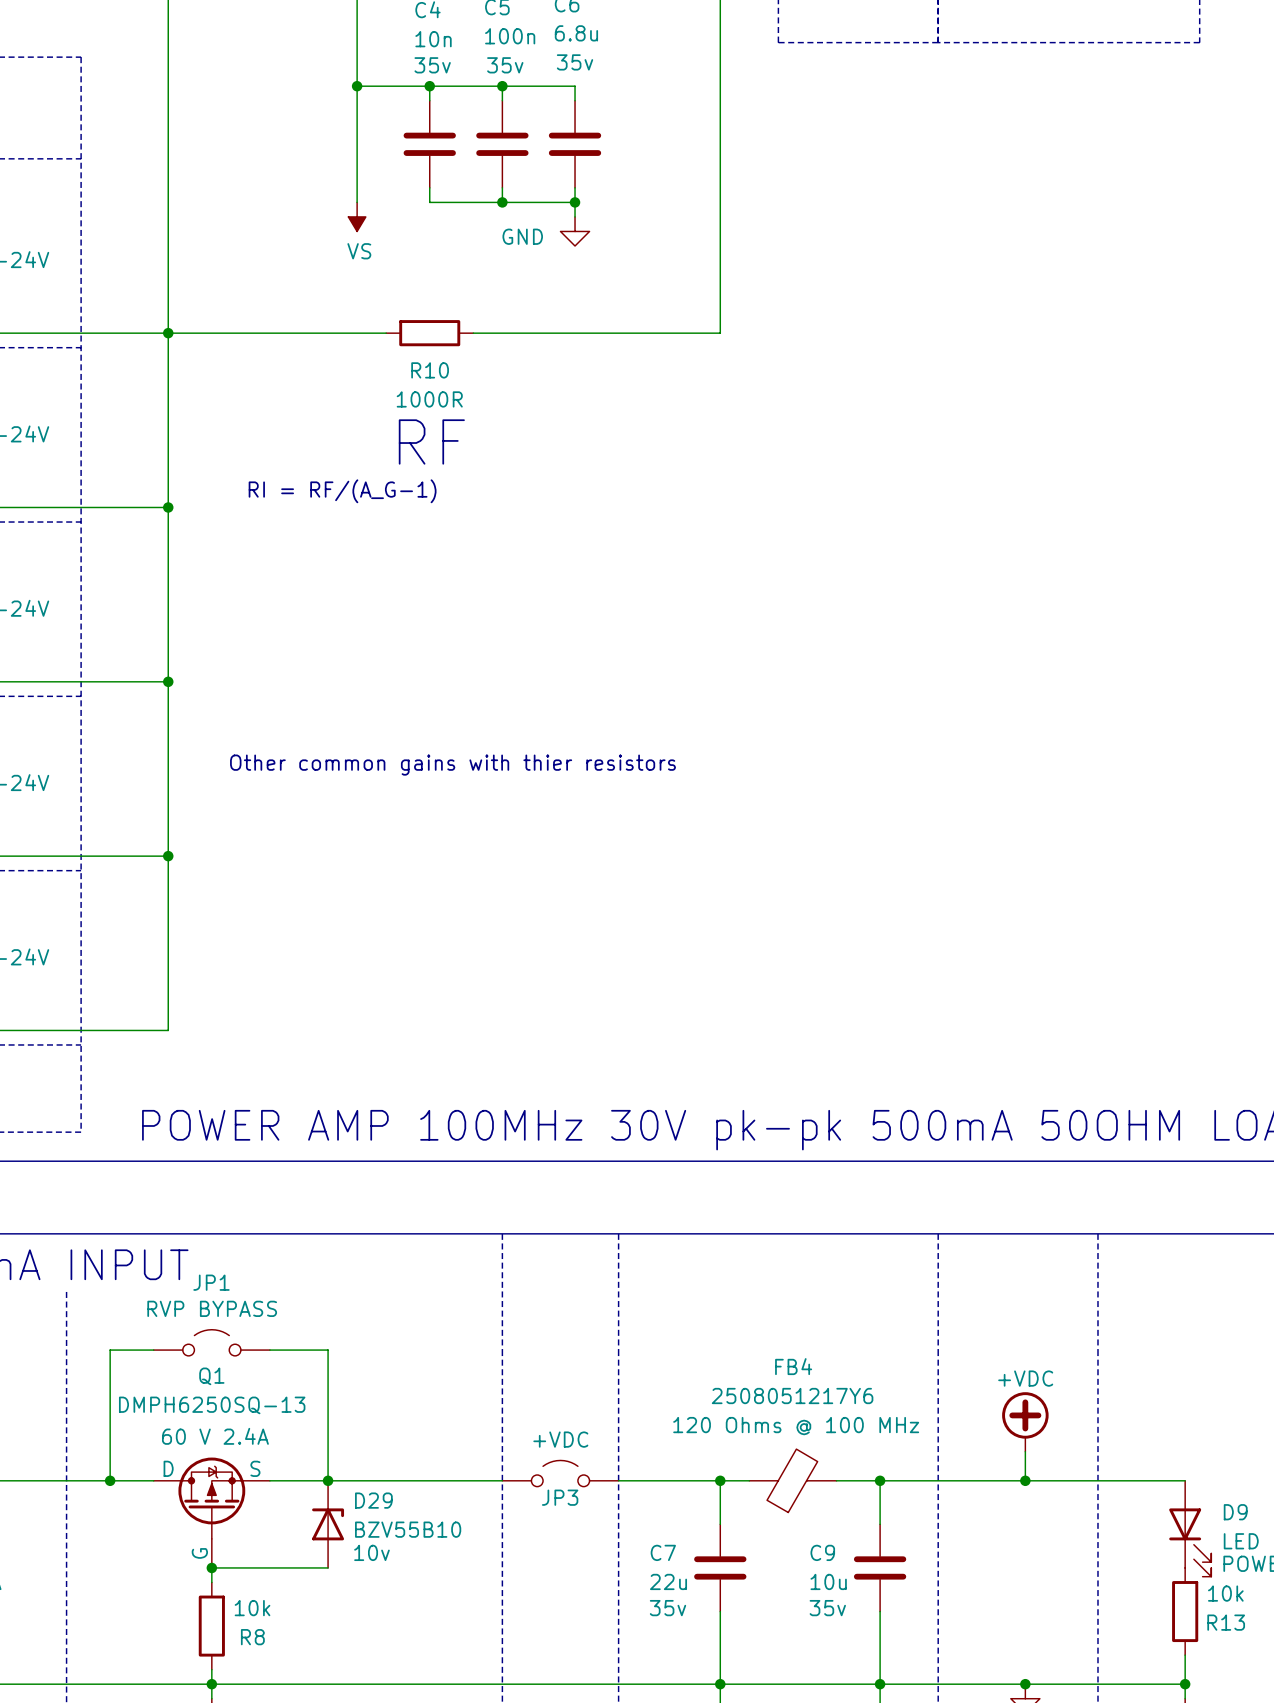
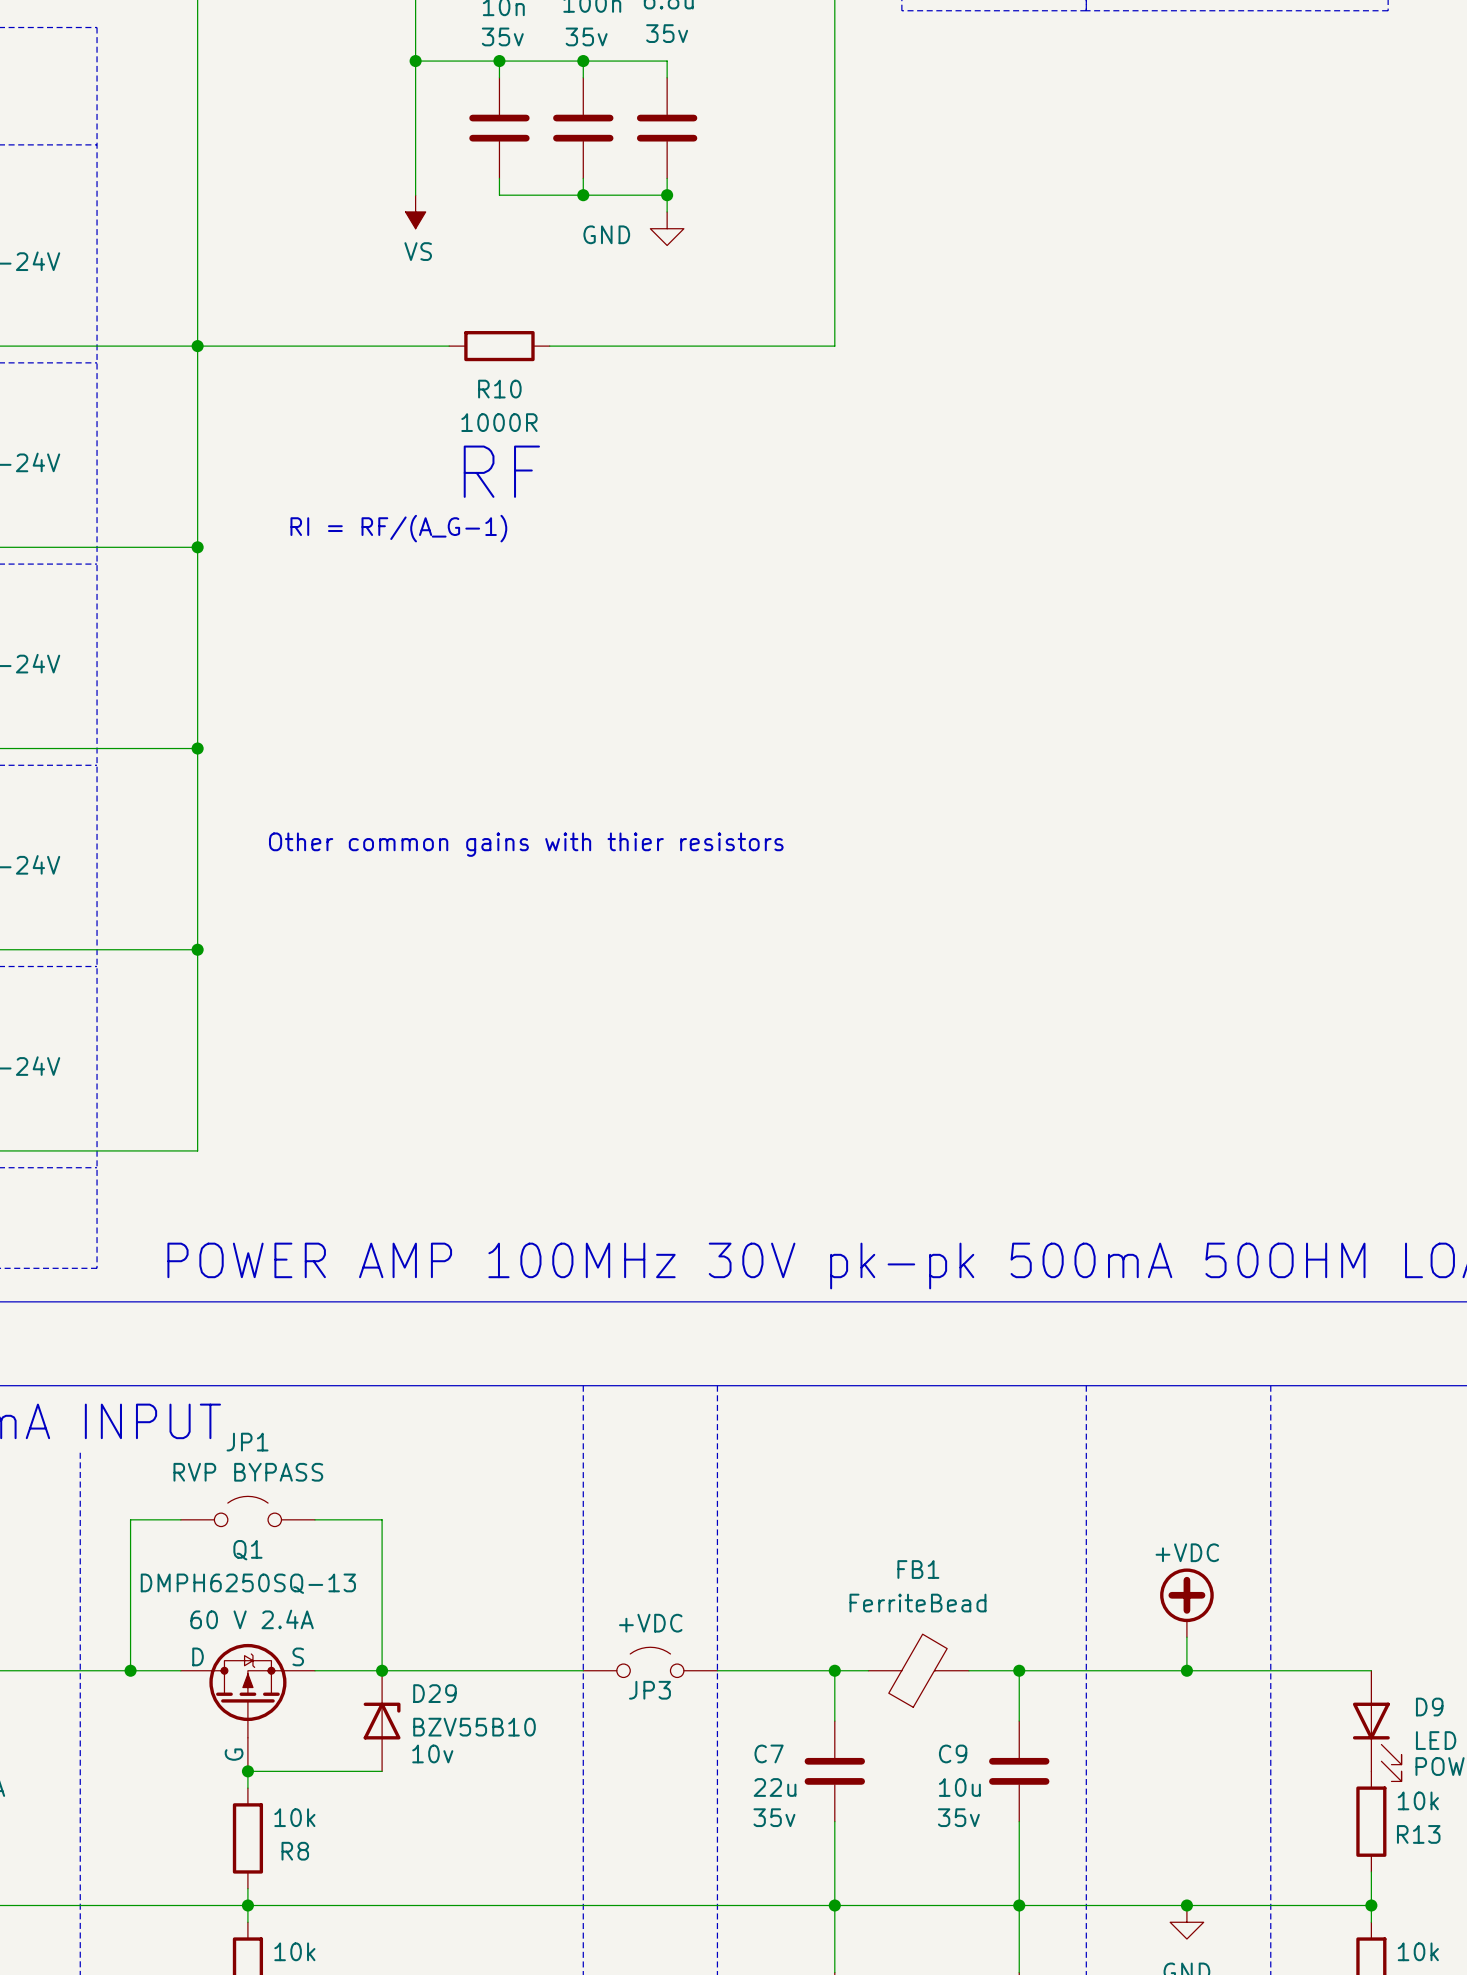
FB4 name: FB4 (793, 1366) -> FB1 (918, 1569)
FB4 value: 2508051217Y6 (792, 1396) -> FerriteBead (917, 1603)
FB4 text: 120 Ohms @ 100 MHz (796, 1426) -> none

